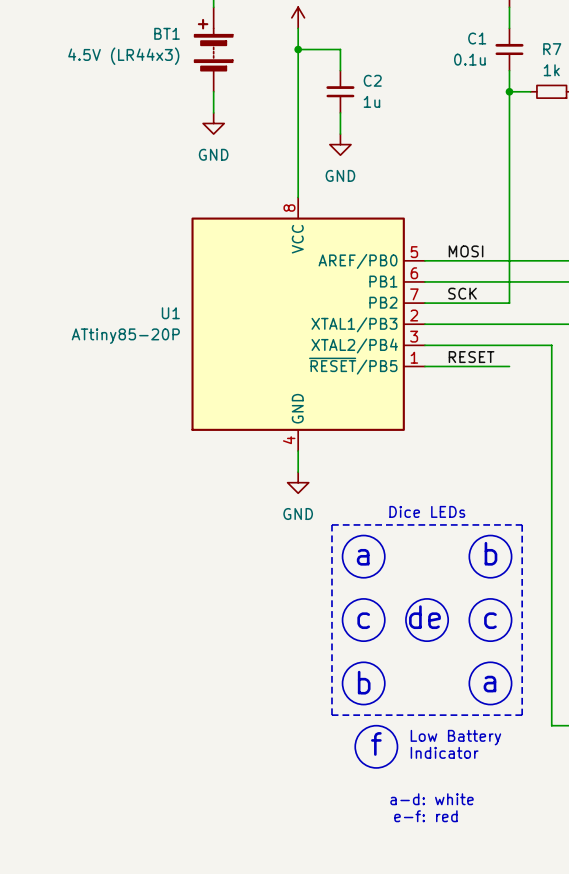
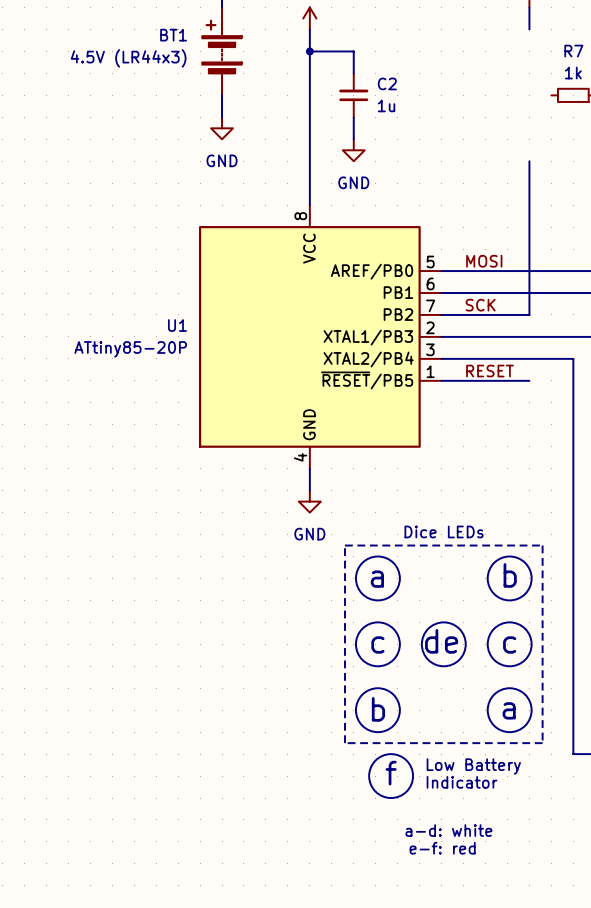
C1: 0.1u (509, 49) -> none
wire: (509, 70) (509, 155) -> none
wire: (509, 91) (530, 91) -> none
junction: (509, 91) -> none

